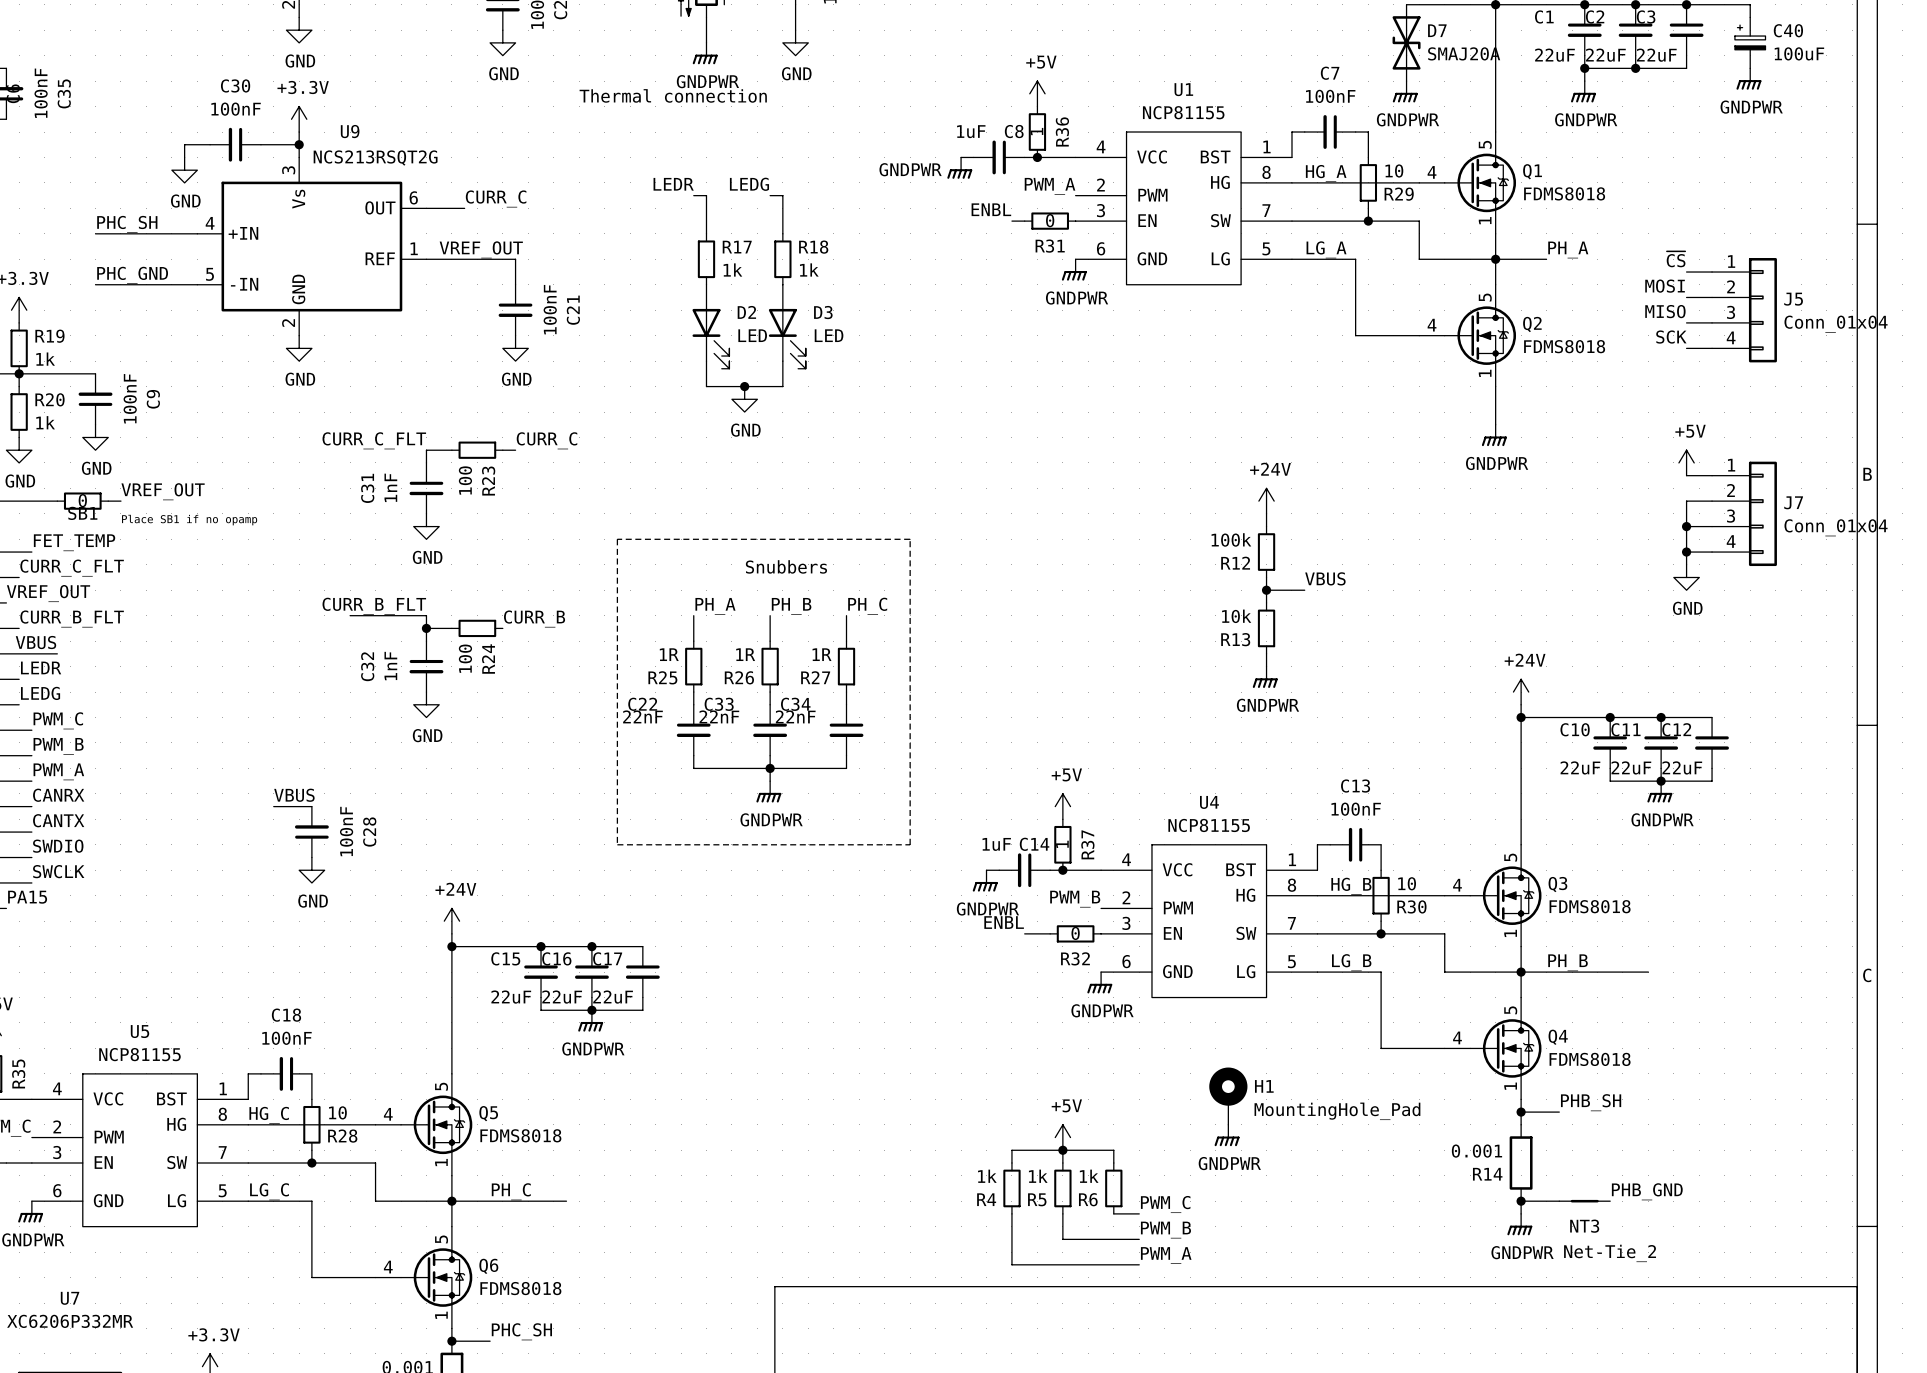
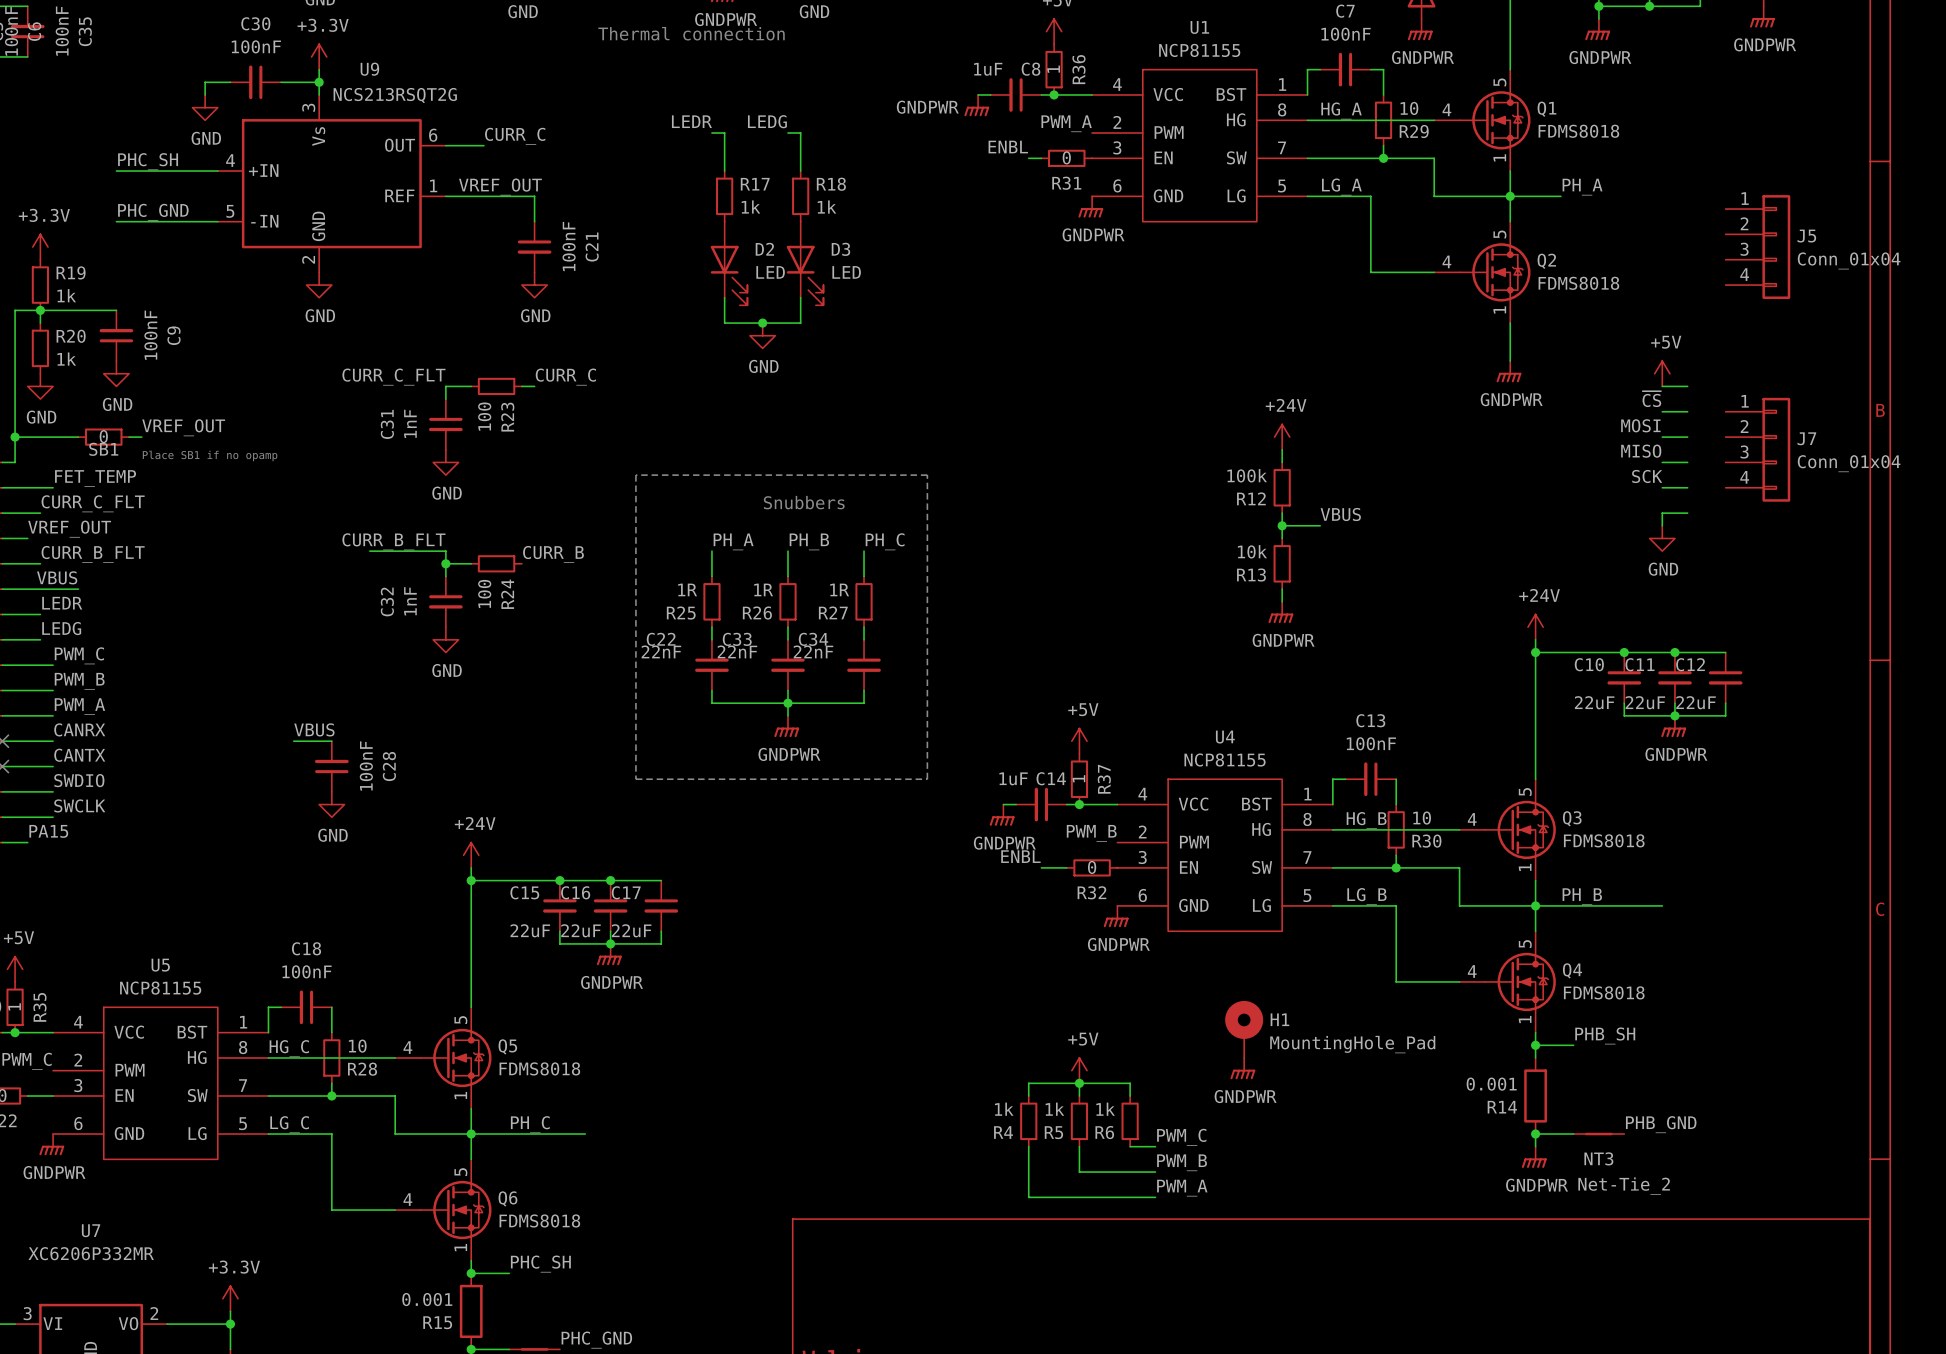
label position: ~{CS} (1676, 259) -> ~{CS} (1651, 399)
wire: (1686, 272) (1712, 272) -> (1662, 386) (1687, 386)
label position: MOSI (1665, 286) -> MOSI (1640, 425)
wire: (1686, 297) (1712, 297) -> (1662, 411) (1687, 411)
label position: MISO (1665, 311) -> MISO (1641, 451)
wire: (1686, 322) (1712, 322) -> (1662, 437) (1687, 437)
label position: SCK (1671, 337) -> SCK (1647, 476)
wire: (1686, 348) (1712, 348) -> (1662, 462) (1687, 462)
power symbol position: +5V (1686, 462) -> +5V (1662, 373)
wire: (1686, 475) (1712, 475) -> none
wire: (1712, 501) (1686, 501) (1686, 564) -> none
wire: (1686, 526) (1712, 526) -> none
junction: (1686, 526) -> none
wire: (1686, 552) (1712, 552) -> (1662, 487) (1687, 487)
junction: (1686, 552) -> none
wire: none -> (1687, 513) (1662, 513) (1662, 525)
power symbol position: GND (1686, 577) -> GND (1662, 538)

